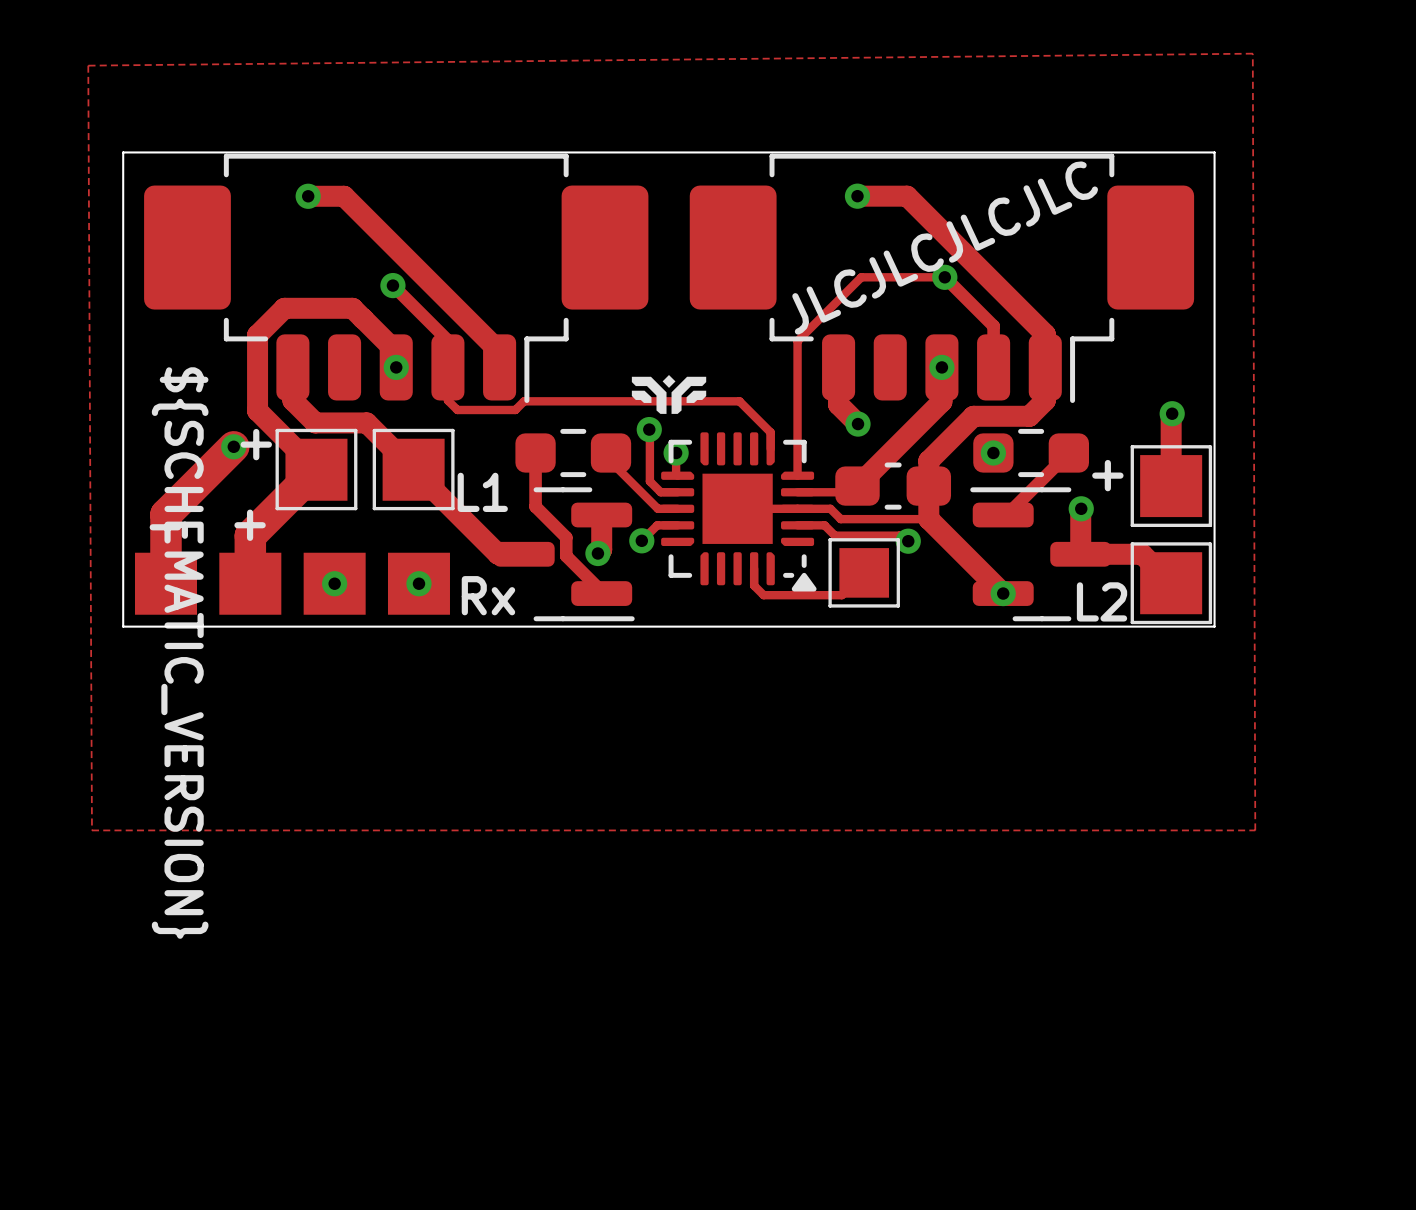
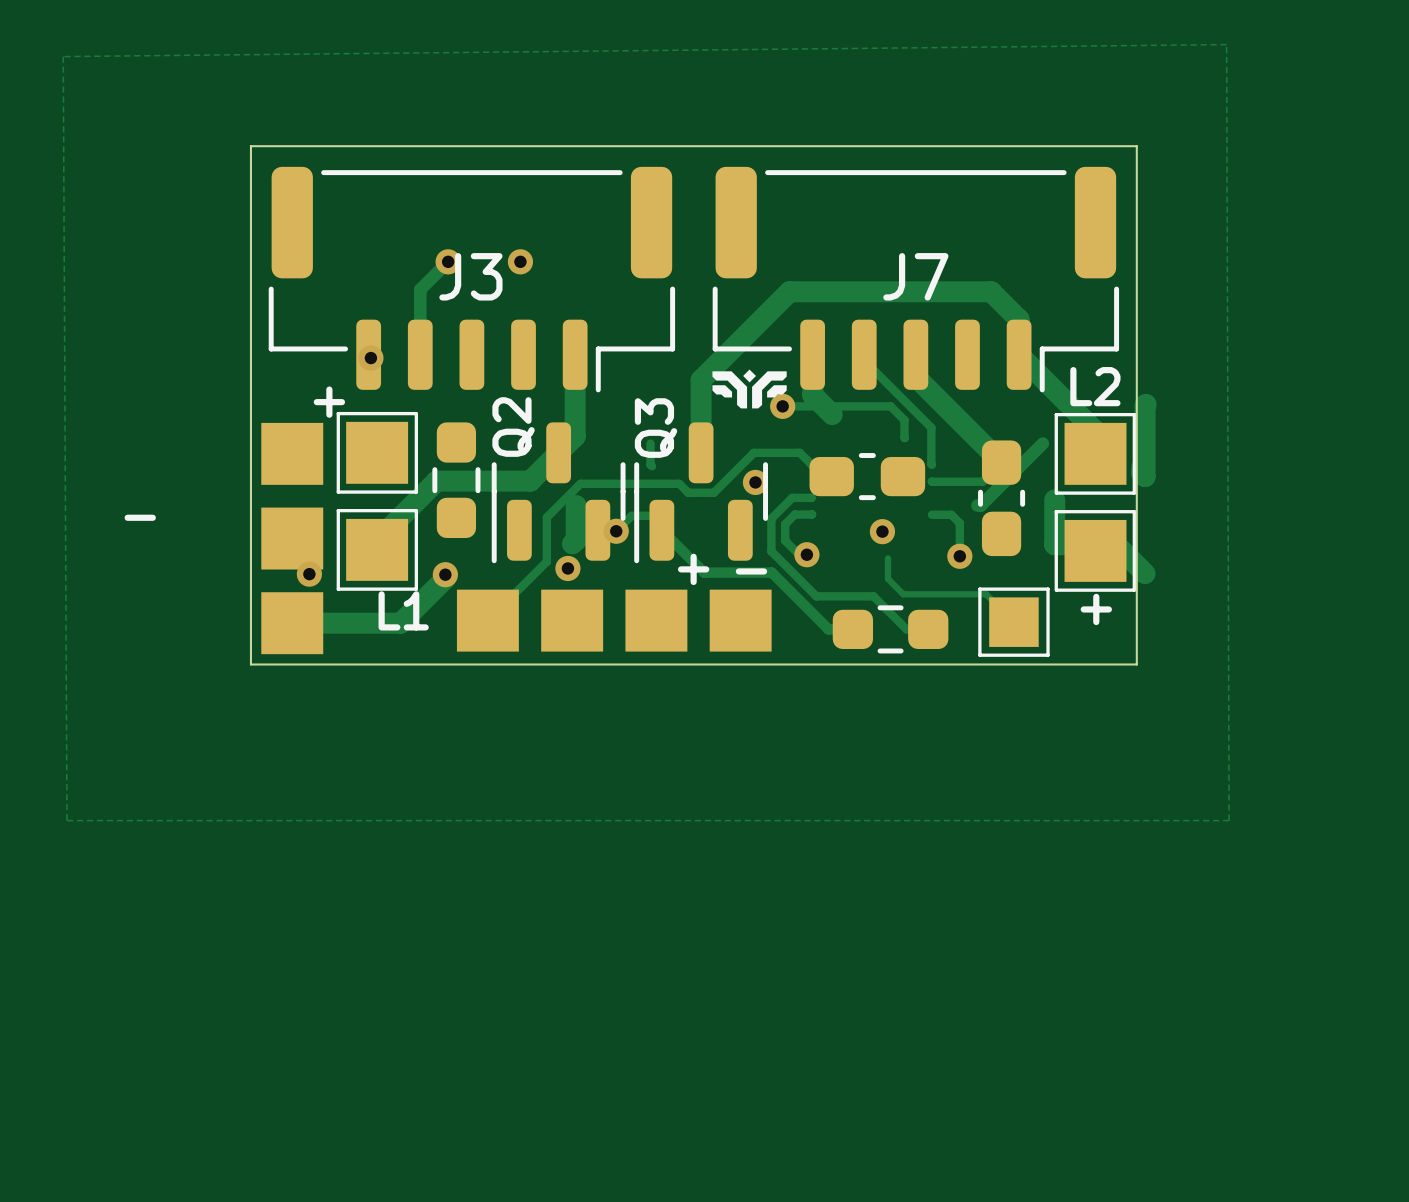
board edge: (123, 152) (1214, 152) (1214, 626) (123, 626) (123, 152) -> (250, 146) (250, 664) (1136, 664) (1136, 146) (250, 146)
track: (308, 196) (344, 196) (499, 351) (499, 367) -> none
via: (308, 196) -> none
track: (857, 196) (907, 196) (1045, 334) (1045, 400) (1029, 416) (973, 416) (928, 460) (928, 519) -> none
via: (857, 196) -> none
text: JLCJLCJLCJLC (945, 248) -> none
track: none -> (448, 261) (420, 289) (420, 354)
via: none -> (448, 261)
via: none -> (520, 261)
via: (944, 277) -> none
part: (396, 278) -> none
part: (941, 278) -> none
track: (392, 285) (447, 340) (447, 400) (457, 409) (515, 409) (524, 401) (739, 401) (770, 432) (770, 448) -> none
via: (392, 285) -> none
J3: none -> (471, 279)
J7: none -> (915, 279)
track: none -> (575, 354) (575, 436) (530, 481) (436, 481) (377, 540) (377, 549)
track: none -> (864, 354) (864, 360) (931, 427) (931, 464)
track: none -> (915, 354) (915, 376) (1001, 462) (982, 481) (931, 481)
track: (292, 367) (292, 400) (315, 422) (366, 422) (498, 554) (524, 554) -> none
track: (396, 367) (396, 351) (352, 308) (284, 308) (257, 335) (257, 410) (316, 469) (250, 535) (250, 583) -> none
track: (941, 367) (941, 401) (851, 492) (797, 492) -> none
via: (941, 367) -> none
track: (993, 367) (993, 326) (944, 277) (861, 277) (797, 341) (797, 475) -> none
drawing position: (669, 394) -> (749, 388)
text: none -> + (329, 402)
via: (1172, 413) -> none
track: none -> (782, 406) (890, 406) (904, 420) (904, 437)
via position: (858, 424) -> (782, 406)
track: (649, 429) (649, 481) (660, 492) (677, 492) -> none
via: (649, 429) -> none
text: + (256, 444) -> none
track: (233, 446) (165, 514) (165, 583) -> none
via: (233, 446) -> none
track: (535, 453) (535, 506) (566, 537) (566, 556) (601, 593) -> none
part rotation: 0° (573, 453) -> 90° clockwise (456, 480)
part position: (573, 453) -> (456, 480)
track: (611, 453) (611, 461) (657, 508) (677, 508) -> none
via: (676, 453) -> none
via: (993, 453) -> none
part: (1031, 453) -> none
track: none -> (701, 452) (701, 380) (789, 291) (991, 291) (1019, 319) (1019, 354) (1095, 431) (1095, 453)
part rotation: 0° (365, 469) -> 90° clockwise (377, 501)
track: none -> (811, 464) (799, 452) (753, 452) (713, 492) (688, 492) (679, 483) (580, 483) (546, 517) (546, 561) (487, 620)
text position: + (1107, 475) -> + (1096, 609)
via: none -> (755, 482)
text position: L1 (482, 492) -> L1 (403, 610)
Q2: none -> (558, 492)
Q3: none -> (701, 492)
track: none -> (811, 497) (792, 497) (771, 518) (771, 551) (816, 596) (873, 596) (906, 629) (928, 629)
part: none -> (1001, 498)
track: (737, 508) (830, 508) (840, 519) (928, 519) -> none
via: (1081, 508) -> none
part: (738, 511) -> none
track: (928, 519) (1003, 593) -> none
track: none -> (811, 514) (794, 514) (785, 524) (785, 540) (799, 554) (806, 554)
track: none -> (931, 514) (951, 514) (959, 523) (959, 556)
text: + (250, 525) -> none
track: (797, 525) (824, 525) (834, 535) (899, 535) (904, 541) (908, 541) -> none
part rotation: 0° (1171, 534) -> 180° (1095, 502)
track: none -> (661, 530) (704, 572) (771, 572) (828, 629) (852, 629)
part: none -> (292, 538)
via position: (597, 553) -> (567, 568)
part: (564, 554) -> none
part: (1040, 554) -> none
via: none -> (806, 554)
track: none -> (887, 558) (887, 578) (903, 594) (986, 594) (1013, 622)
track: (754, 568) (754, 585) (763, 595) (841, 595) (864, 572) -> none
part position: (864, 572) -> (1013, 622)
text: none -> + (693, 569)
text: none -> - (751, 571)
part position: (292, 583) -> (614, 620)
via position: (418, 583) -> (445, 574)
track: none -> (445, 574) (445, 578) (400, 623) (292, 623)
via position: (1003, 593) -> (959, 556)
text: Rx (488, 595) -> none
text position: L2 (1102, 601) -> L2 (1095, 386)
part: none -> (890, 629)
text: ${SCHEMATIC_VERSION} (180, 653) -> none

